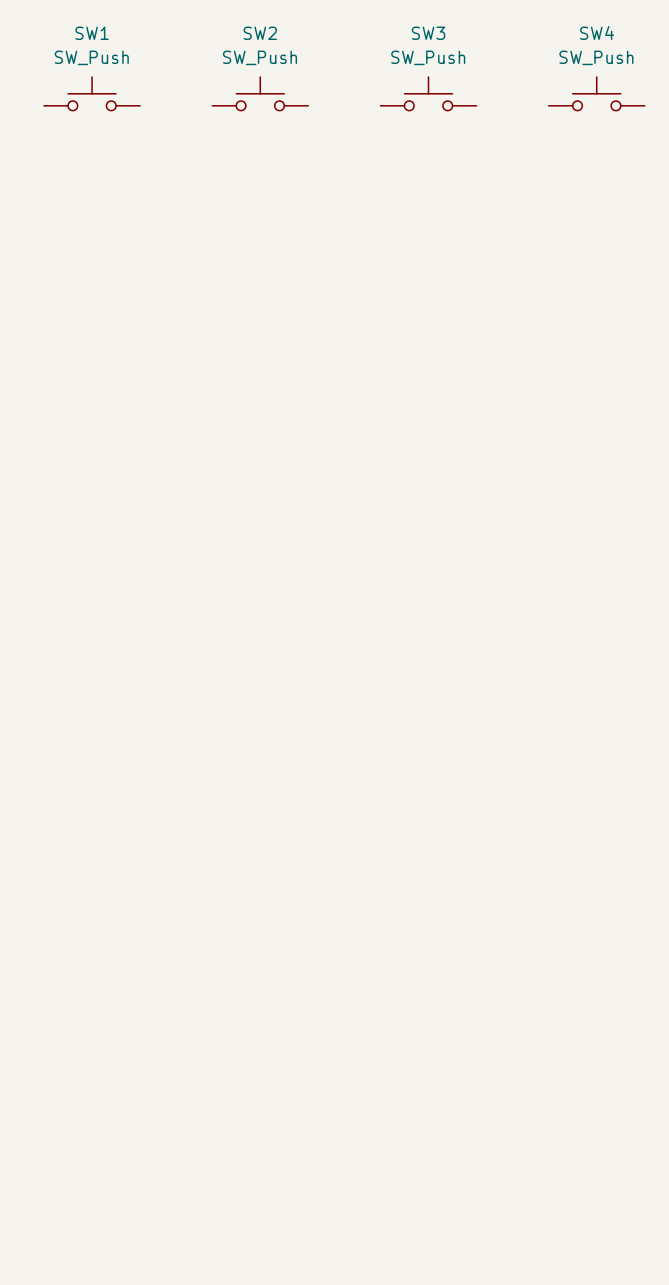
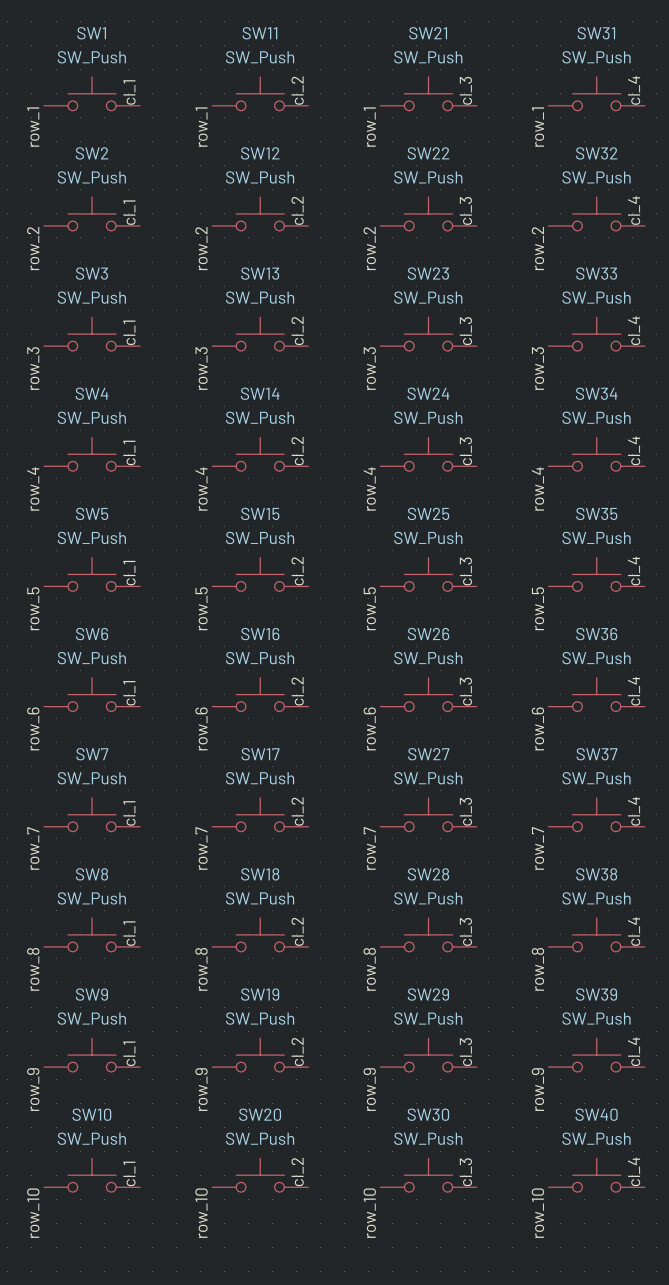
SW4 name: SW4 (597, 32) -> SW31 (596, 33)
SW2 name: SW2 (260, 33) -> SW11 (259, 33)
SW3 name: SW3 (428, 33) -> SW21 (428, 33)
label: none -> cl_4 (634, 90)
label: none -> cl_1 (129, 92)
label: none -> cl_2 (297, 90)
label: none -> cl_3 (465, 90)
label: none -> row_1 (33, 127)
label: none -> row_1 (201, 127)
label: none -> row_1 (369, 127)
label: none -> row_1 (538, 127)
label: none -> cl_1 (129, 212)
label: none -> cl_2 (297, 210)
label: none -> cl_3 (465, 210)
label: none -> cl_4 (634, 210)
SW2: none -> SW_Push (92, 213)
SW12: none -> SW_Push (260, 213)
SW22: none -> SW_Push (428, 213)
SW32: none -> SW_Push (596, 213)
label: none -> row_2 (33, 248)
label: none -> row_2 (201, 248)
label: none -> row_2 (369, 248)
label: none -> row_2 (537, 248)
label: none -> cl_1 (129, 332)
label: none -> cl_2 (297, 330)
label: none -> cl_3 (465, 331)
label: none -> cl_4 (634, 330)
SW3: none -> SW_Push (92, 334)
SW13: none -> SW_Push (260, 334)
SW23: none -> SW_Push (428, 334)
SW33: none -> SW_Push (596, 334)
label: none -> row_3 (33, 368)
label: none -> row_3 (201, 368)
label: none -> row_3 (369, 368)
label: none -> row_3 (538, 368)
label: none -> cl_1 (129, 452)
label: none -> cl_2 (297, 451)
label: none -> cl_3 (465, 451)
label: none -> cl_4 (634, 450)
SW4: none -> SW_Push (92, 454)
SW14: none -> SW_Push (260, 454)
SW24: none -> SW_Push (428, 454)
SW34: none -> SW_Push (596, 454)
label: none -> row_4 (33, 489)
label: none -> row_4 (201, 489)
label: none -> row_4 (369, 489)
label: none -> row_4 (538, 489)
label: none -> cl_1 (129, 573)
label: none -> cl_2 (297, 571)
label: none -> cl_3 (465, 571)
label: none -> cl_4 (634, 571)
SW5: none -> SW_Push (92, 574)
SW15: none -> SW_Push (260, 574)
SW25: none -> SW_Push (428, 574)
SW35: none -> SW_Push (596, 574)
label: none -> row_5 (33, 608)
label: none -> row_5 (201, 608)
label: none -> row_5 (369, 608)
label: none -> row_5 (538, 608)
label: none -> cl_4 (634, 691)
label: none -> cl_1 (129, 693)
label: none -> cl_2 (297, 691)
label: none -> cl_3 (465, 691)
SW6: none -> SW_Push (92, 694)
SW16: none -> SW_Push (260, 694)
SW26: none -> SW_Push (428, 694)
SW36: none -> SW_Push (596, 694)
label: none -> row_6 (33, 728)
label: none -> row_6 (201, 728)
label: none -> row_6 (369, 728)
label: none -> row_6 (537, 728)
label: none -> cl_4 (634, 811)
label: none -> cl_1 (129, 813)
label: none -> cl_2 (297, 811)
label: none -> cl_3 (465, 811)
SW7: none -> SW_Push (92, 814)
SW17: none -> SW_Push (260, 814)
SW27: none -> SW_Push (428, 814)
SW37: none -> SW_Push (596, 814)
label: none -> row_7 (33, 848)
label: none -> row_7 (201, 848)
label: none -> row_7 (369, 848)
label: none -> row_7 (538, 848)
label: none -> cl_1 (129, 933)
label: none -> cl_2 (297, 931)
label: none -> cl_3 (465, 931)
label: none -> cl_4 (634, 931)
SW8: none -> SW_Push (92, 934)
SW18: none -> SW_Push (260, 934)
SW28: none -> SW_Push (428, 934)
SW38: none -> SW_Push (596, 934)
label: none -> row_8 (33, 969)
label: none -> row_8 (201, 969)
label: none -> row_8 (369, 969)
label: none -> row_8 (537, 969)
label: none -> cl_1 (129, 1053)
label: none -> cl_2 (297, 1051)
label: none -> cl_3 (465, 1052)
label: none -> cl_4 (634, 1051)
SW9: none -> SW_Push (92, 1055)
SW19: none -> SW_Push (260, 1055)
SW29: none -> SW_Push (428, 1055)
SW39: none -> SW_Push (596, 1055)
label: none -> row_9 (33, 1089)
label: none -> row_9 (201, 1089)
label: none -> row_9 (369, 1089)
label: none -> row_9 (537, 1089)
label: none -> cl_1 (129, 1173)
label: none -> cl_2 (297, 1172)
label: none -> cl_3 (465, 1172)
label: none -> cl_4 (634, 1171)
SW10: none -> SW_Push (92, 1175)
SW20: none -> SW_Push (260, 1175)
SW30: none -> SW_Push (428, 1175)
SW40: none -> SW_Push (596, 1175)
label: none -> row_10 (33, 1213)
label: none -> row_10 (201, 1213)
label: none -> row_10 (369, 1213)
label: none -> row_10 (537, 1213)

